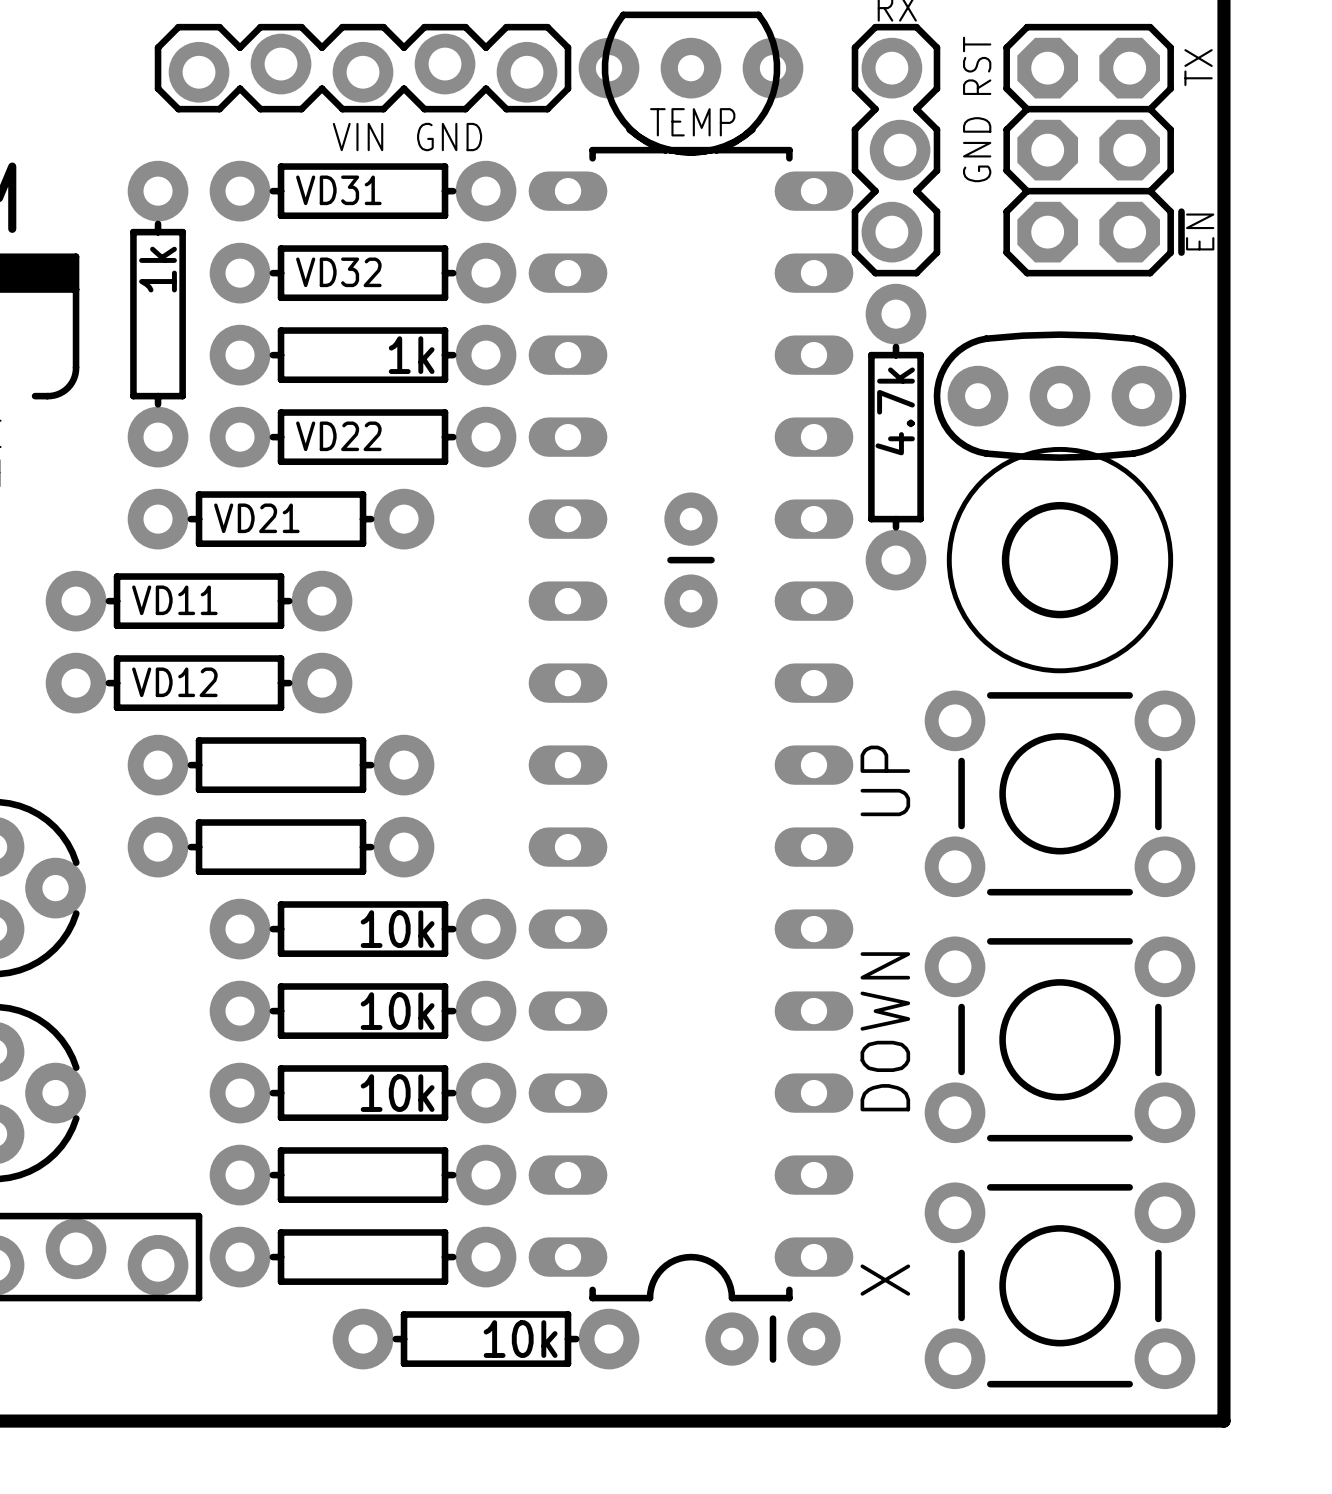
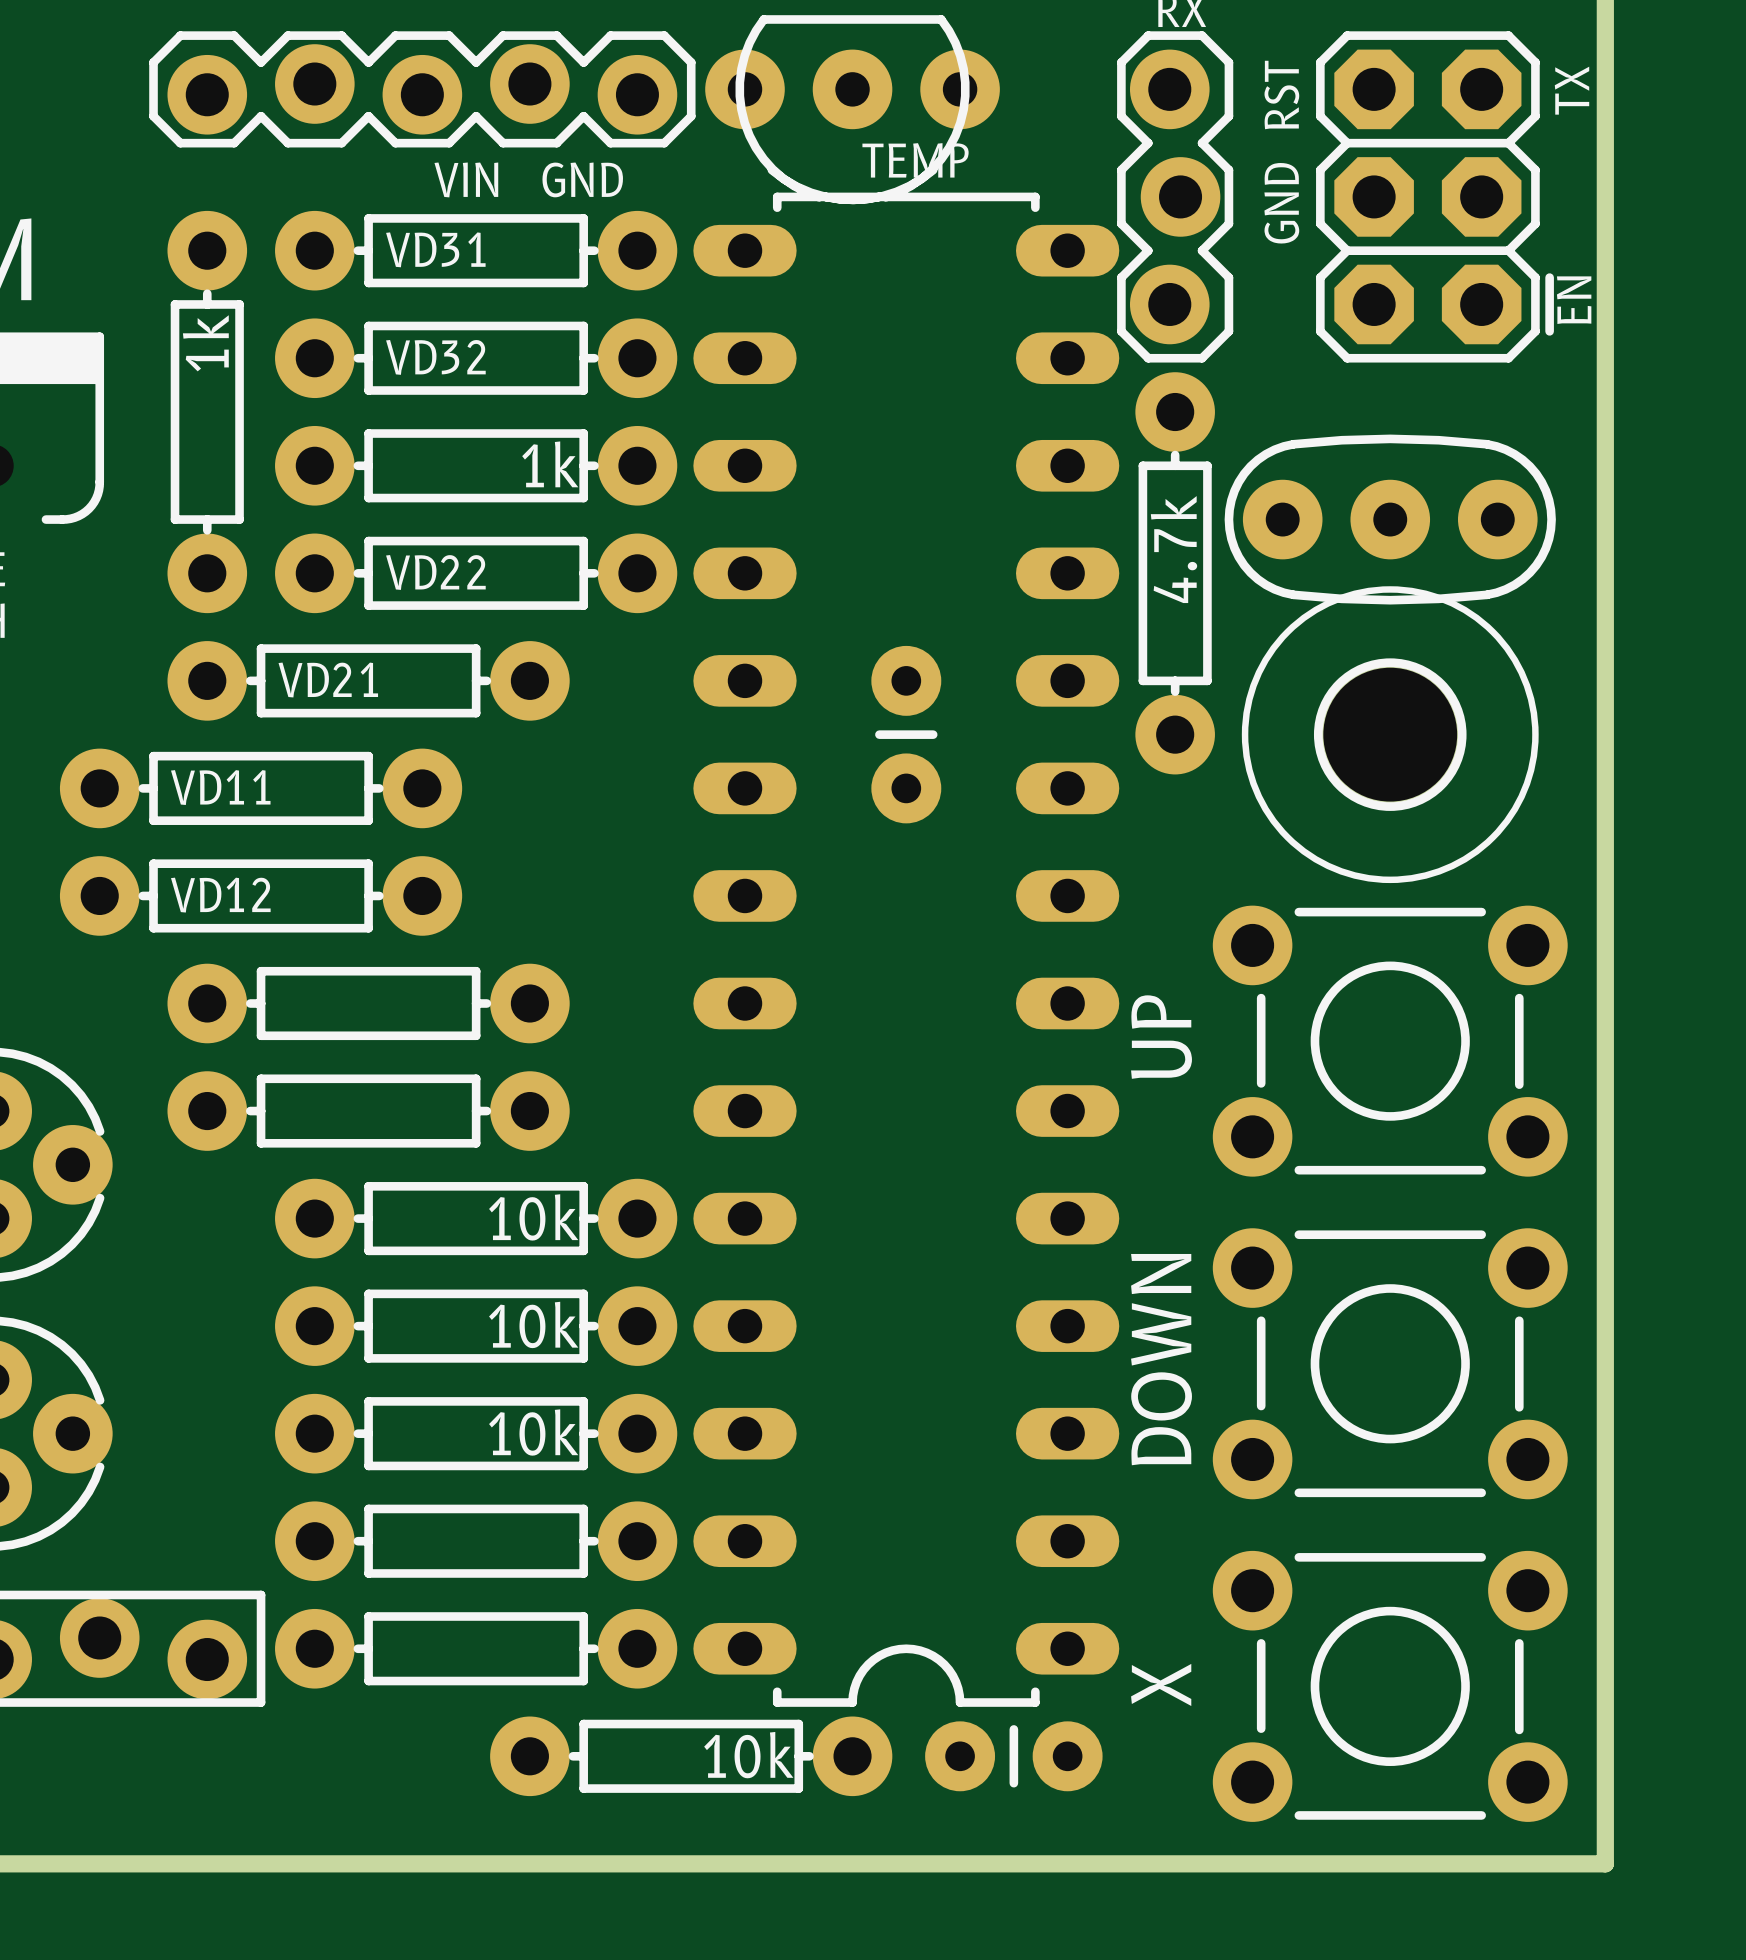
part position: (363, 68) -> (422, 89)
part position: (691, 83) -> (852, 109)
part position: (486, 1339) -> (691, 1756)

